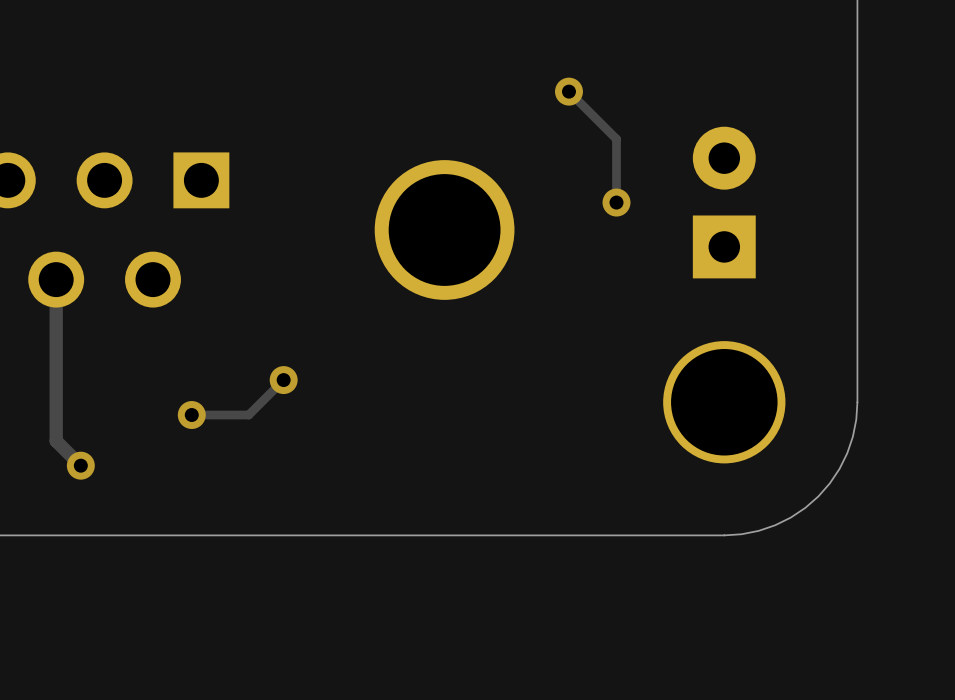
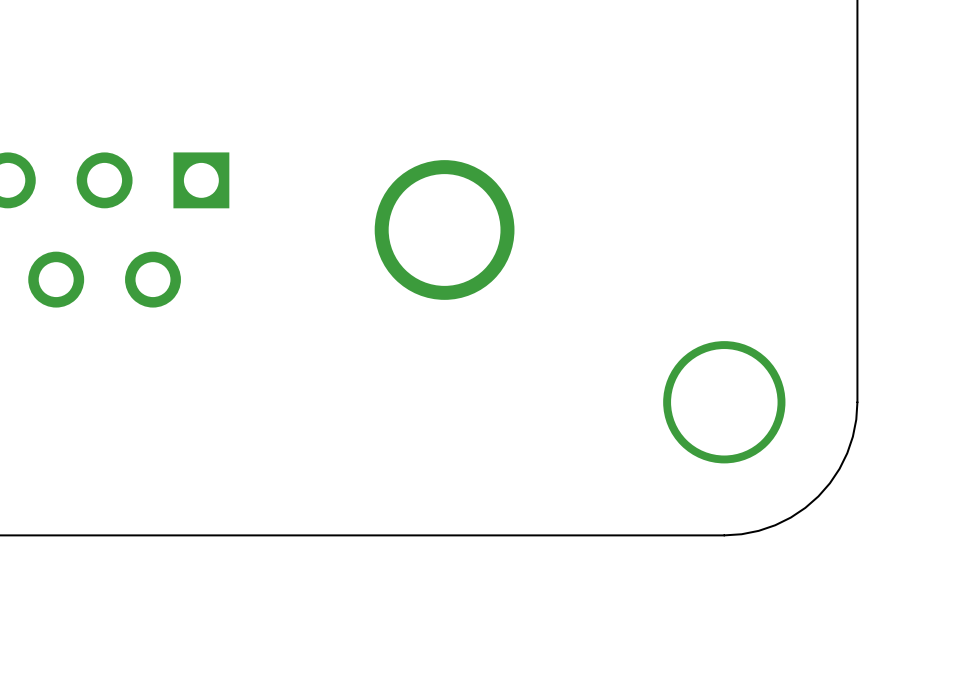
track: (568, 91) (616, 139) (616, 202) -> none
via: (568, 91) -> none
via: (616, 202) -> none
part: (724, 202) -> none
track: (56, 279) (56, 441) (80, 465) -> none
track: (283, 380) (248, 415) (191, 415) -> none
via: (283, 380) -> none
via: (191, 415) -> none
via: (80, 465) -> none

